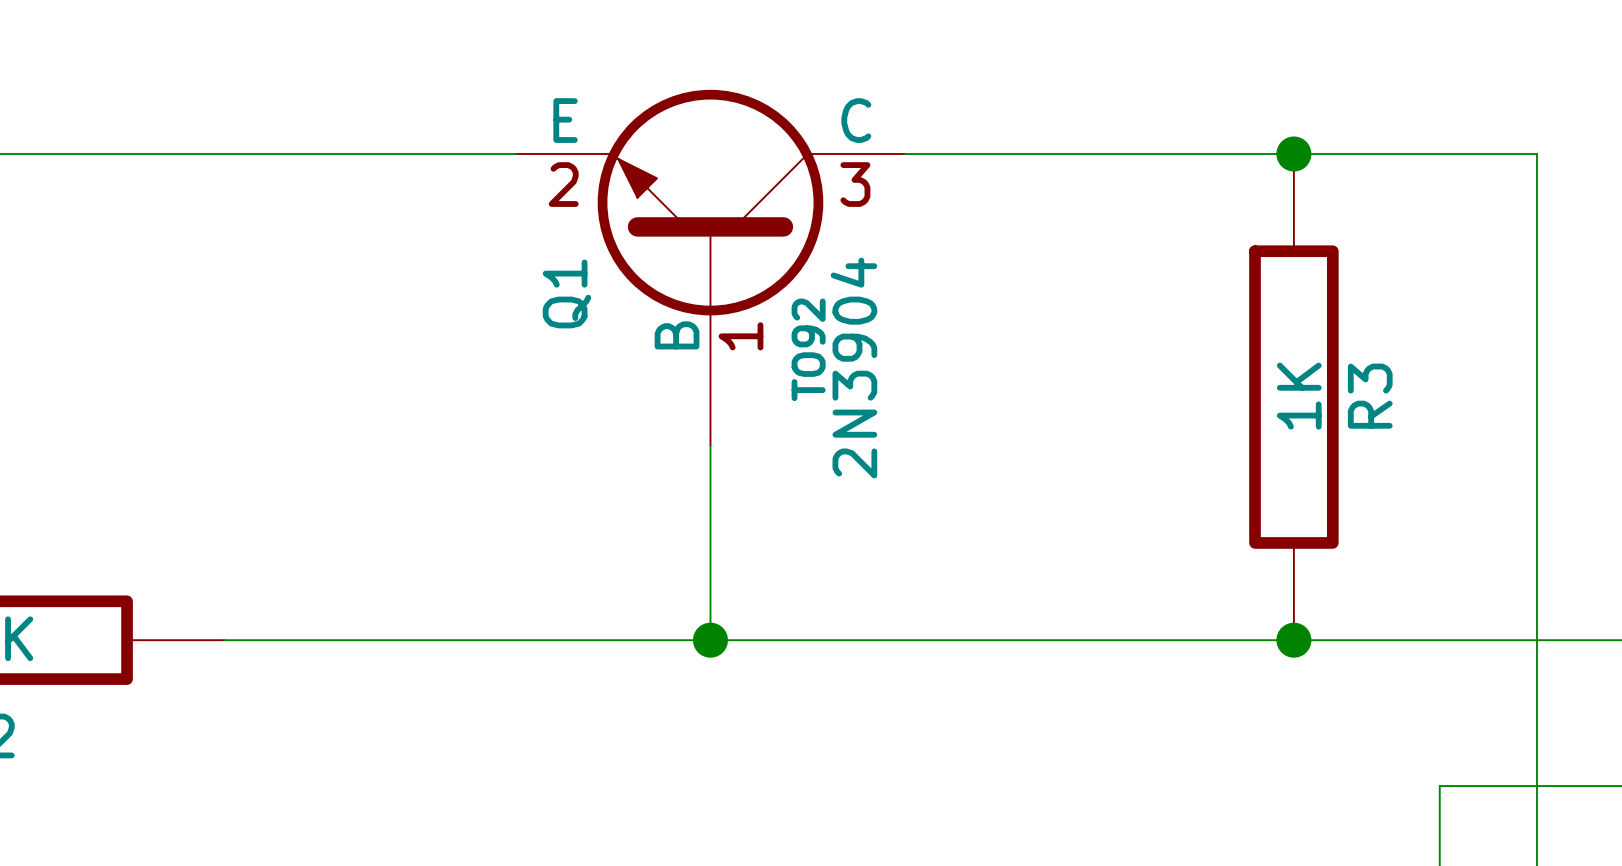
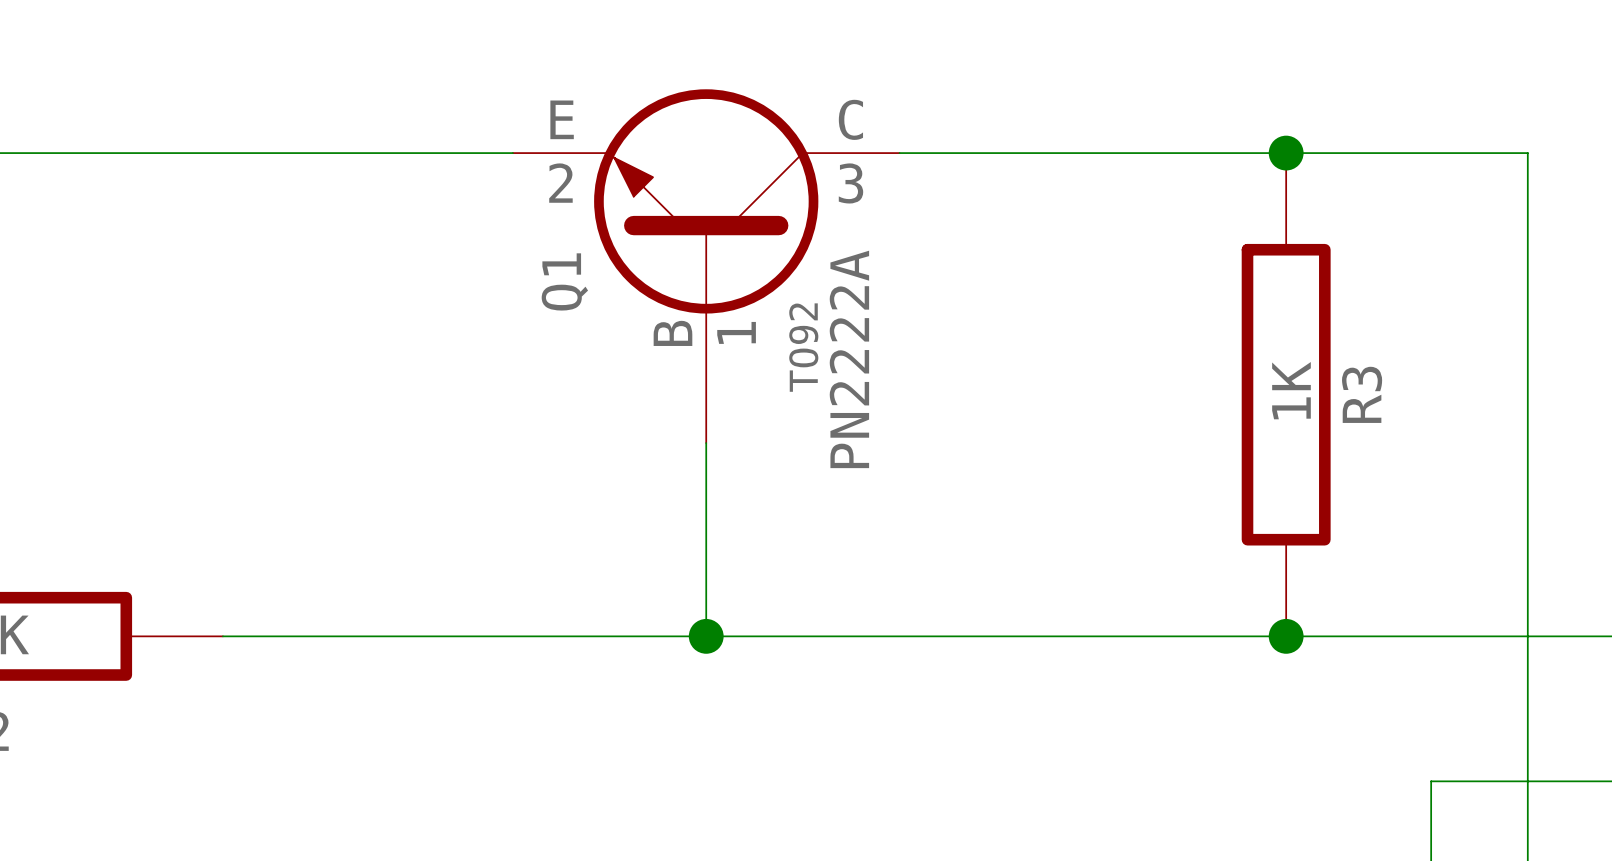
Q1 value: 2N3904 (853, 368) -> PN2222A (849, 359)

